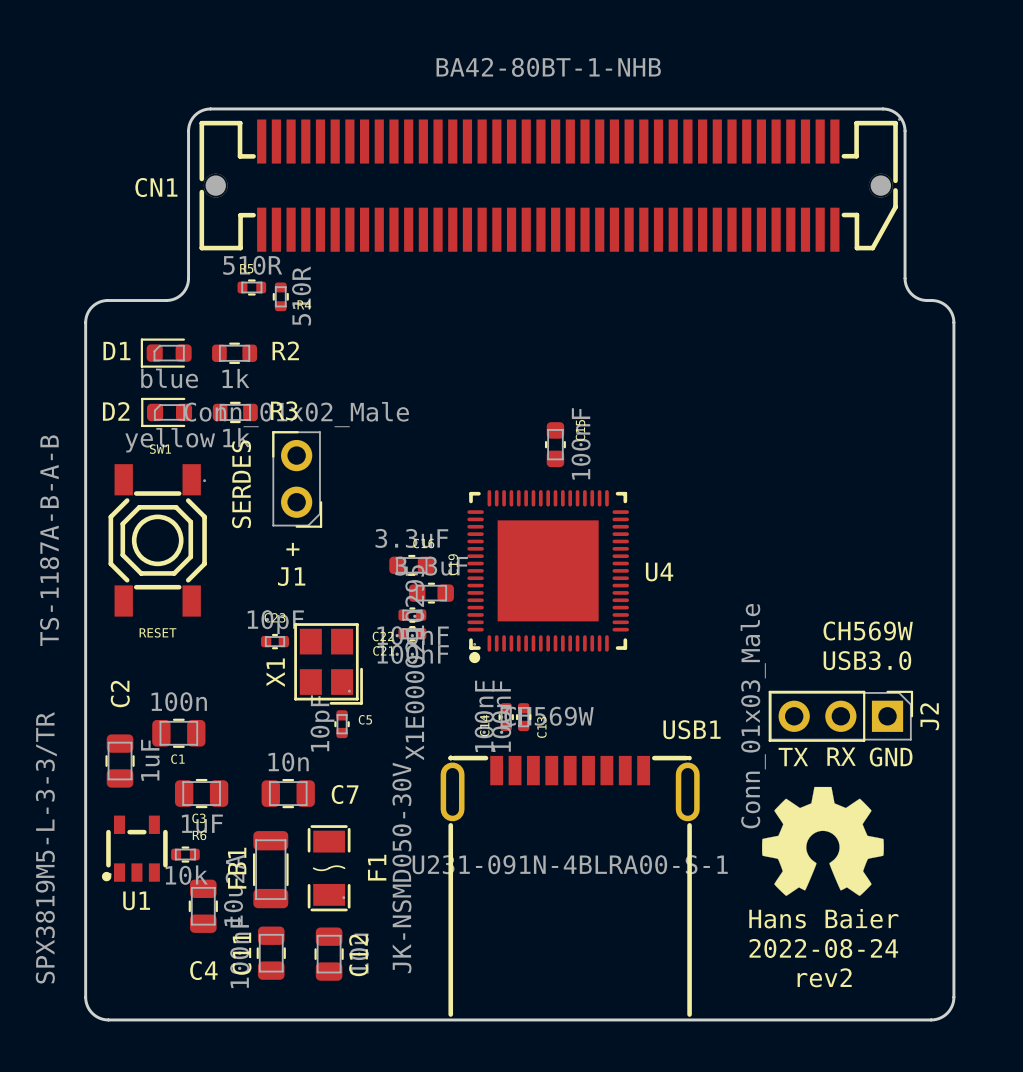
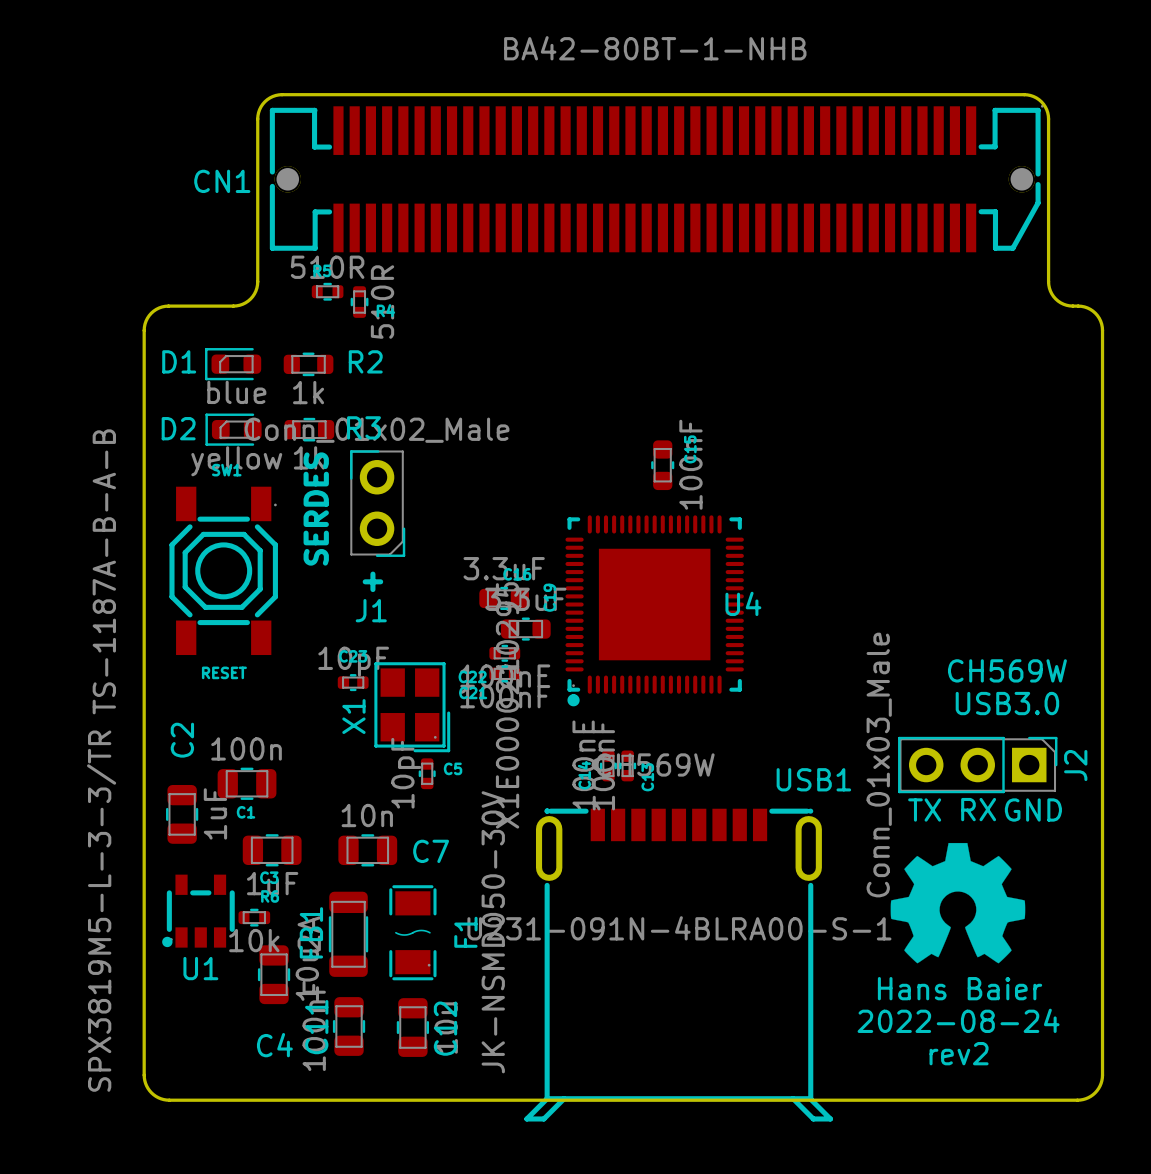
U4 name position: U4 (659, 572) -> U4 (743, 603)
USB1 footprint: [440, 755, 700, 1017] -> [524, 808, 833, 1122]

